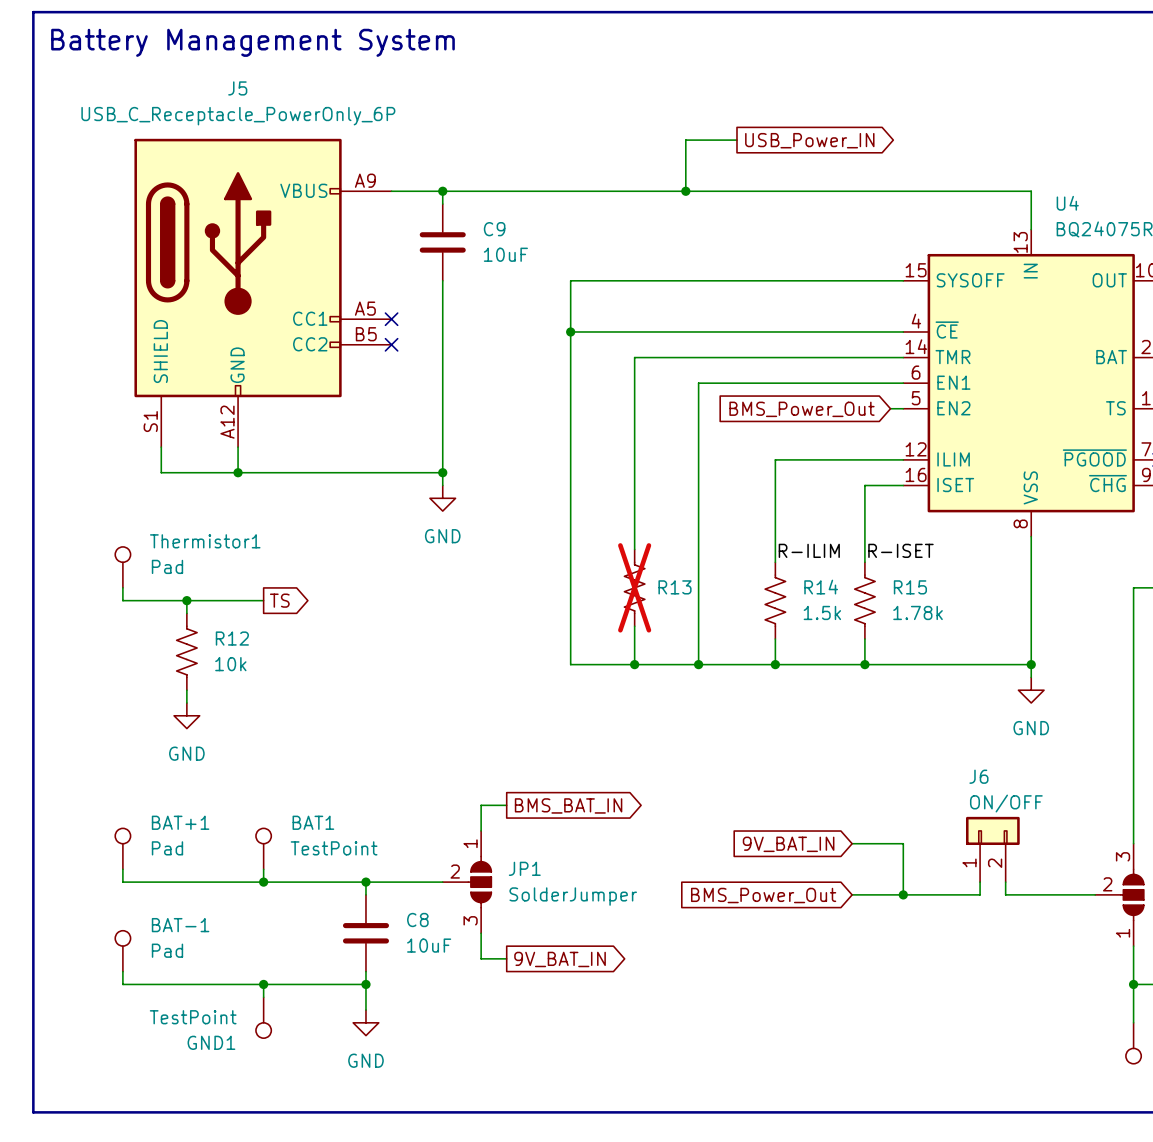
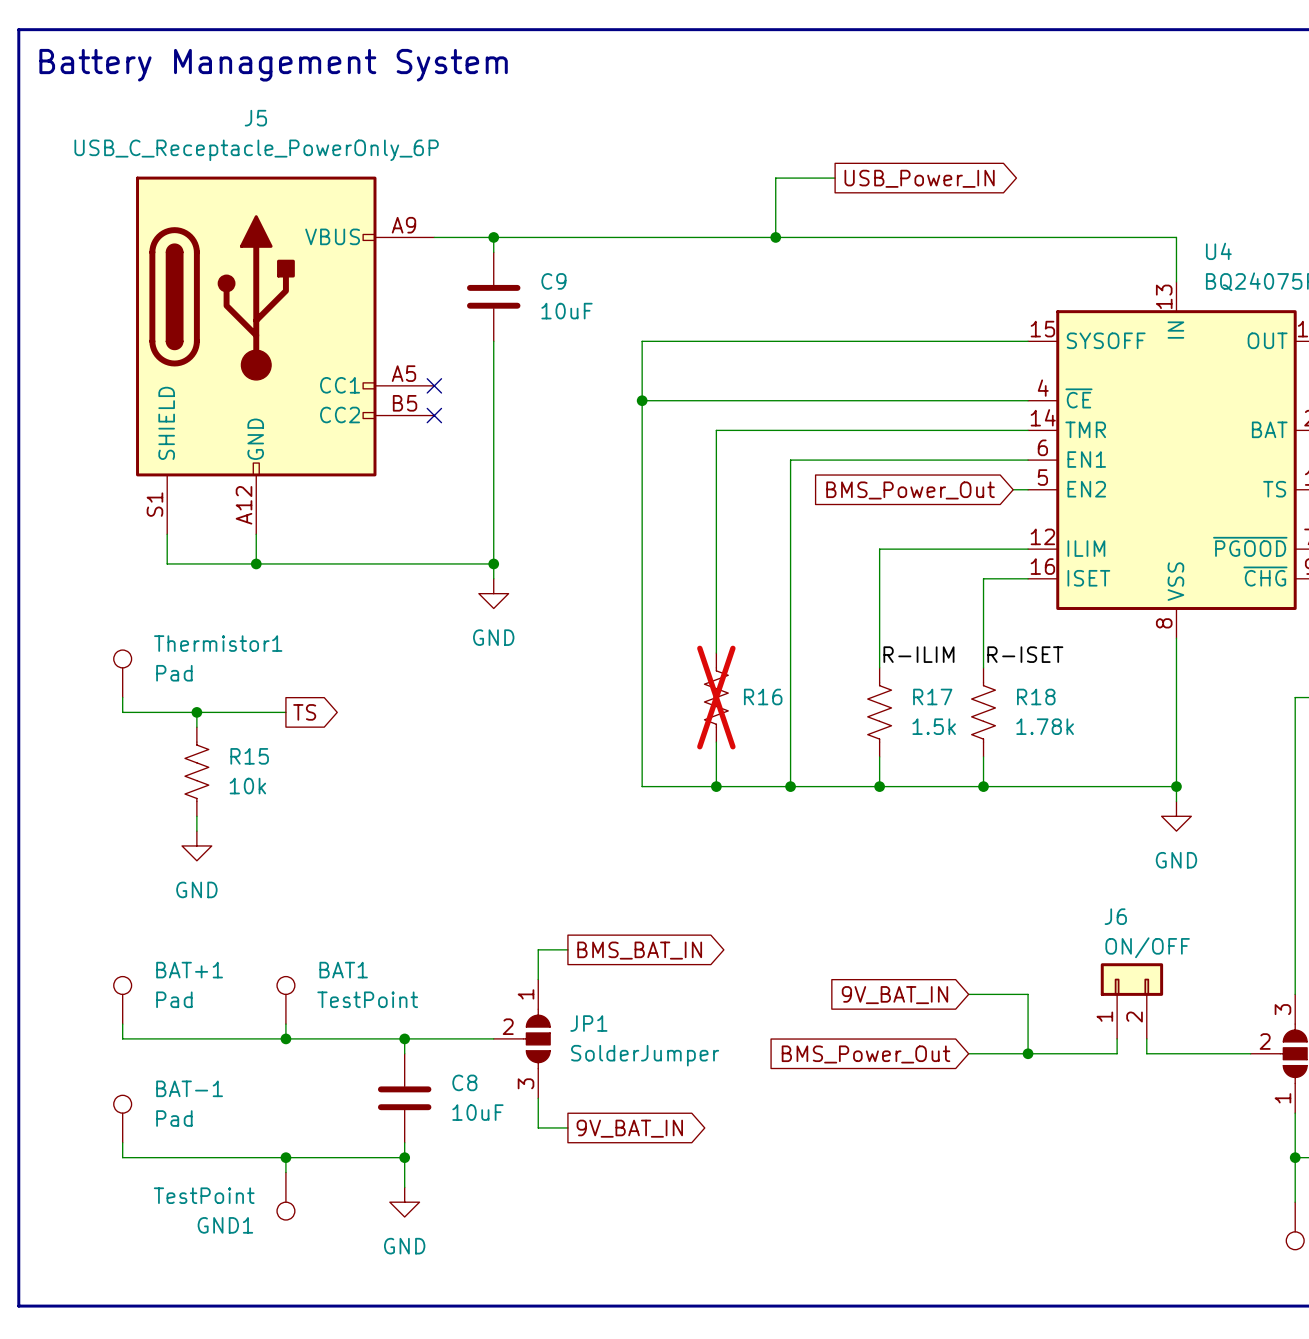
R13 name: R13 (675, 587) -> R16 (763, 696)
R14 name: R14 (821, 587) -> R17 (932, 696)
R15 name: R15 (910, 587) -> R18 (1036, 696)
R12 name: R12 (232, 638) -> R15 (249, 756)

